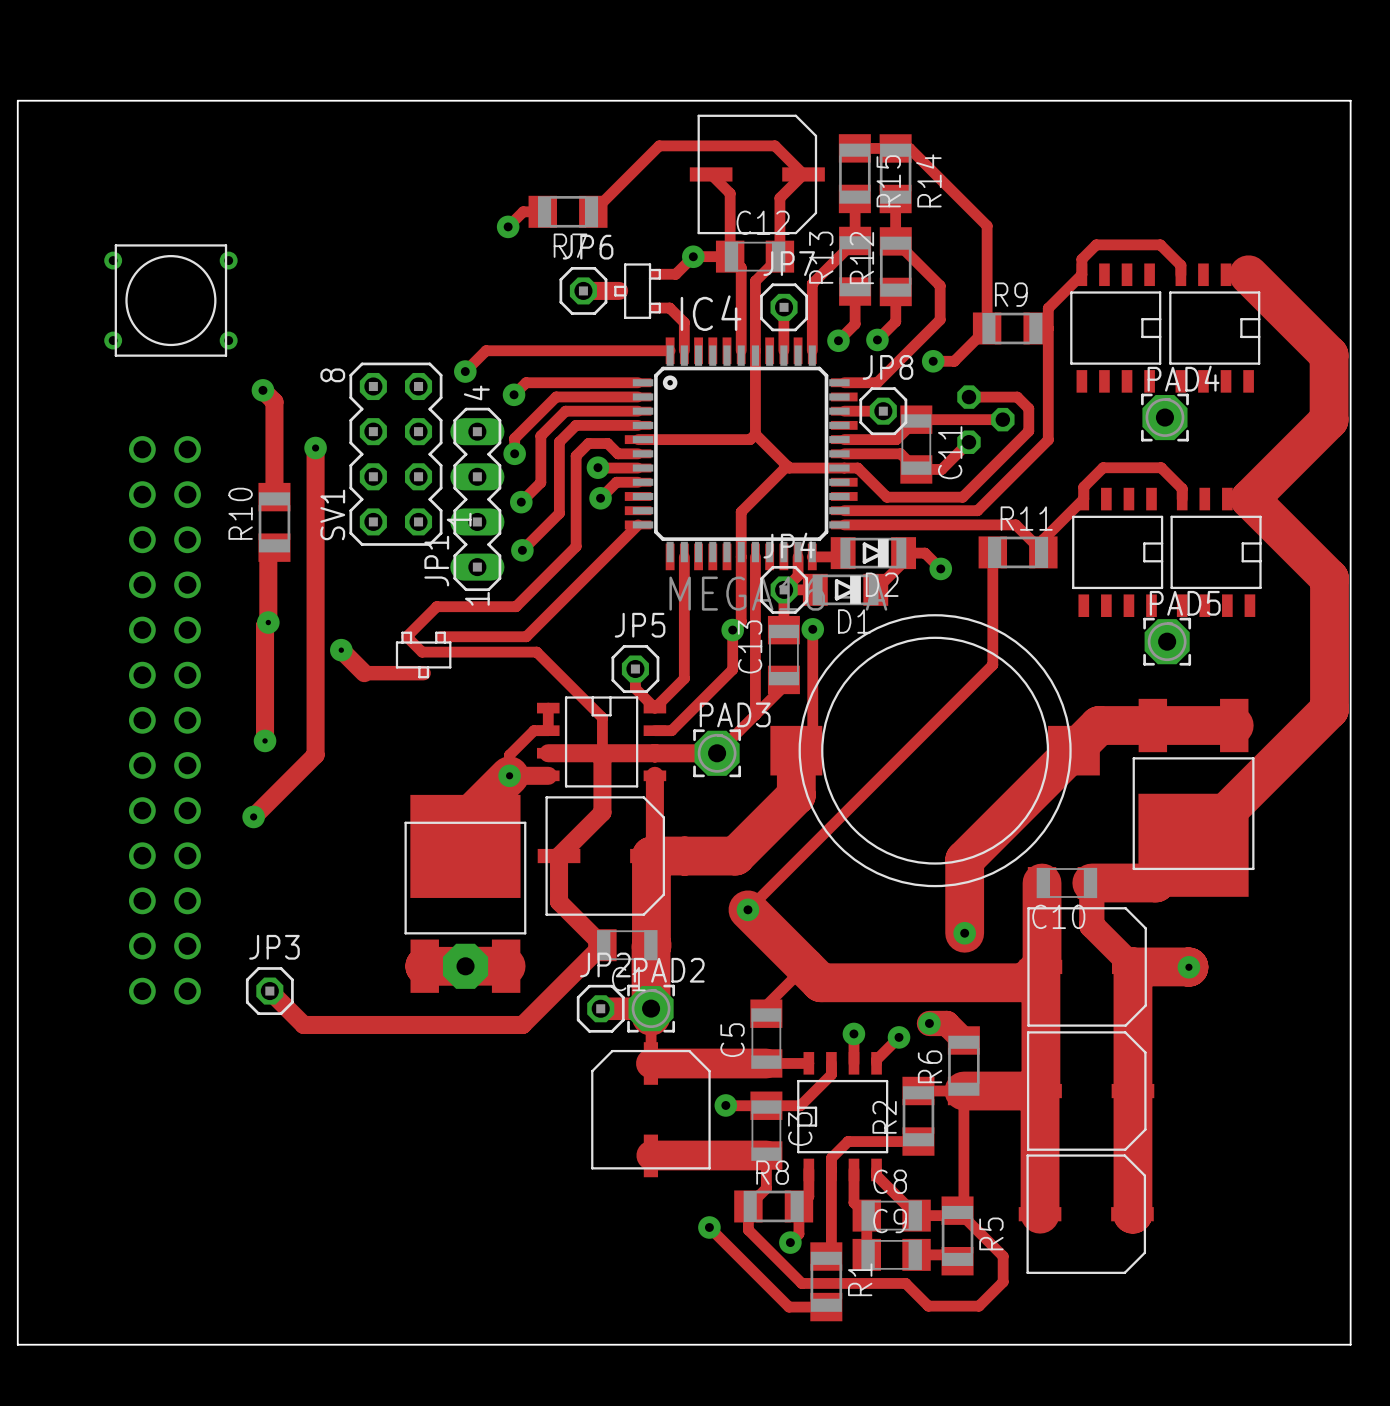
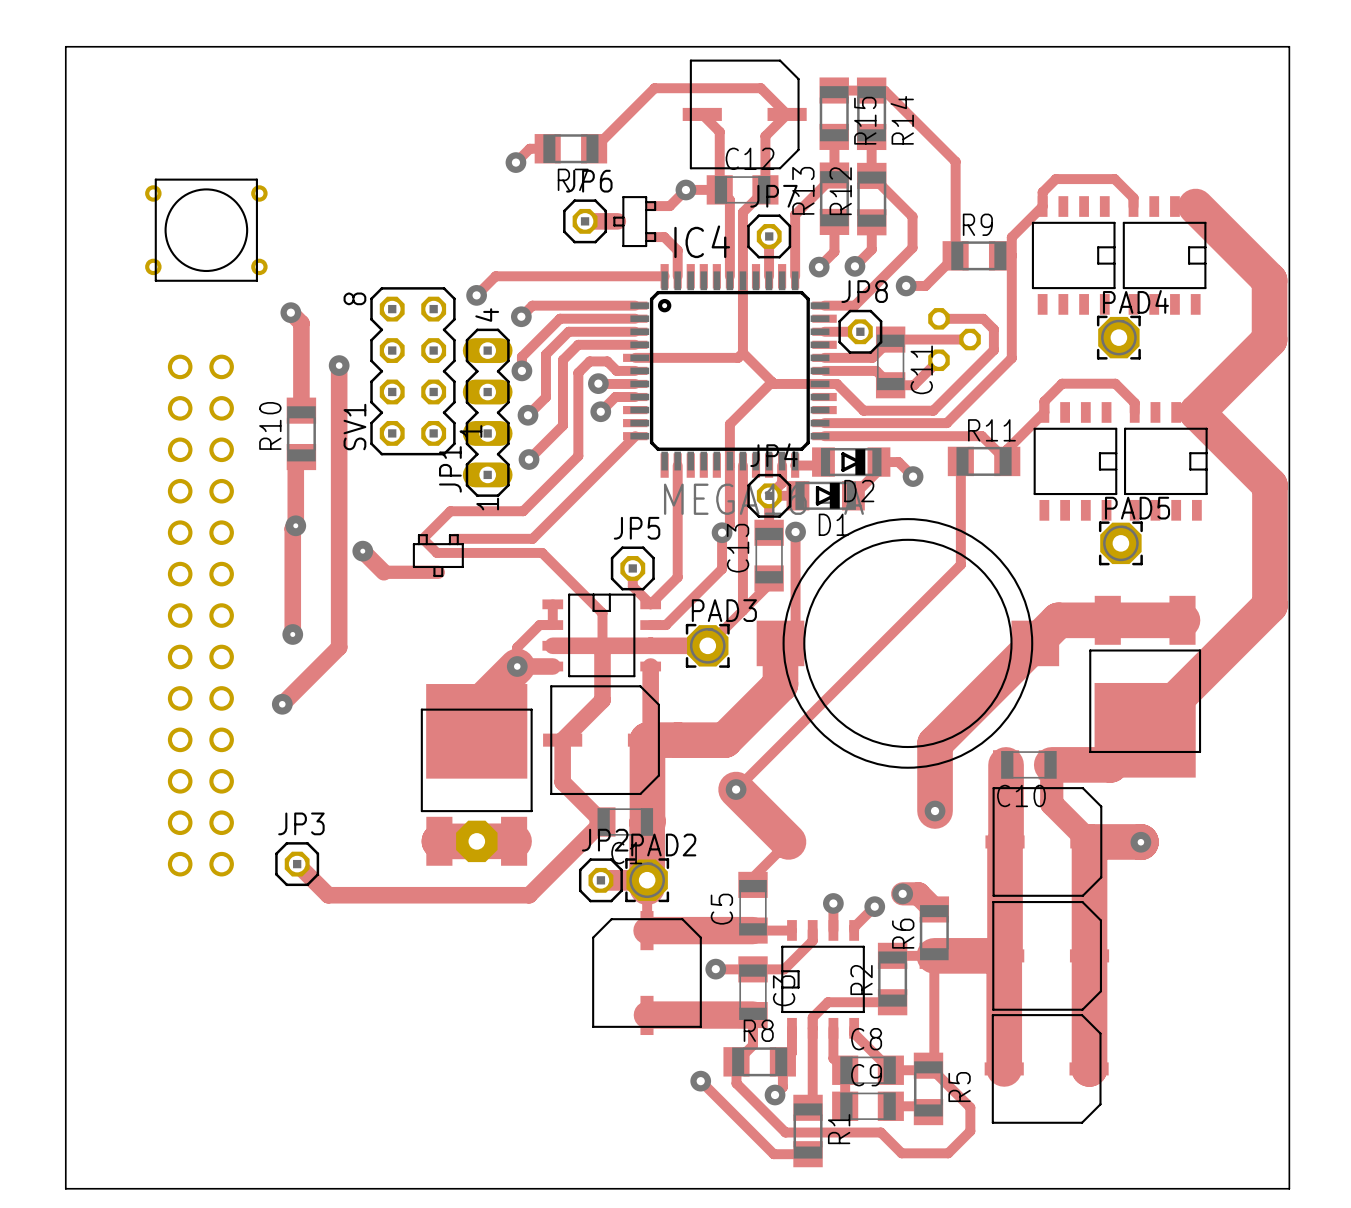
track: (1042, 965) (1025, 982) (820, 982) (805, 966) -> none

